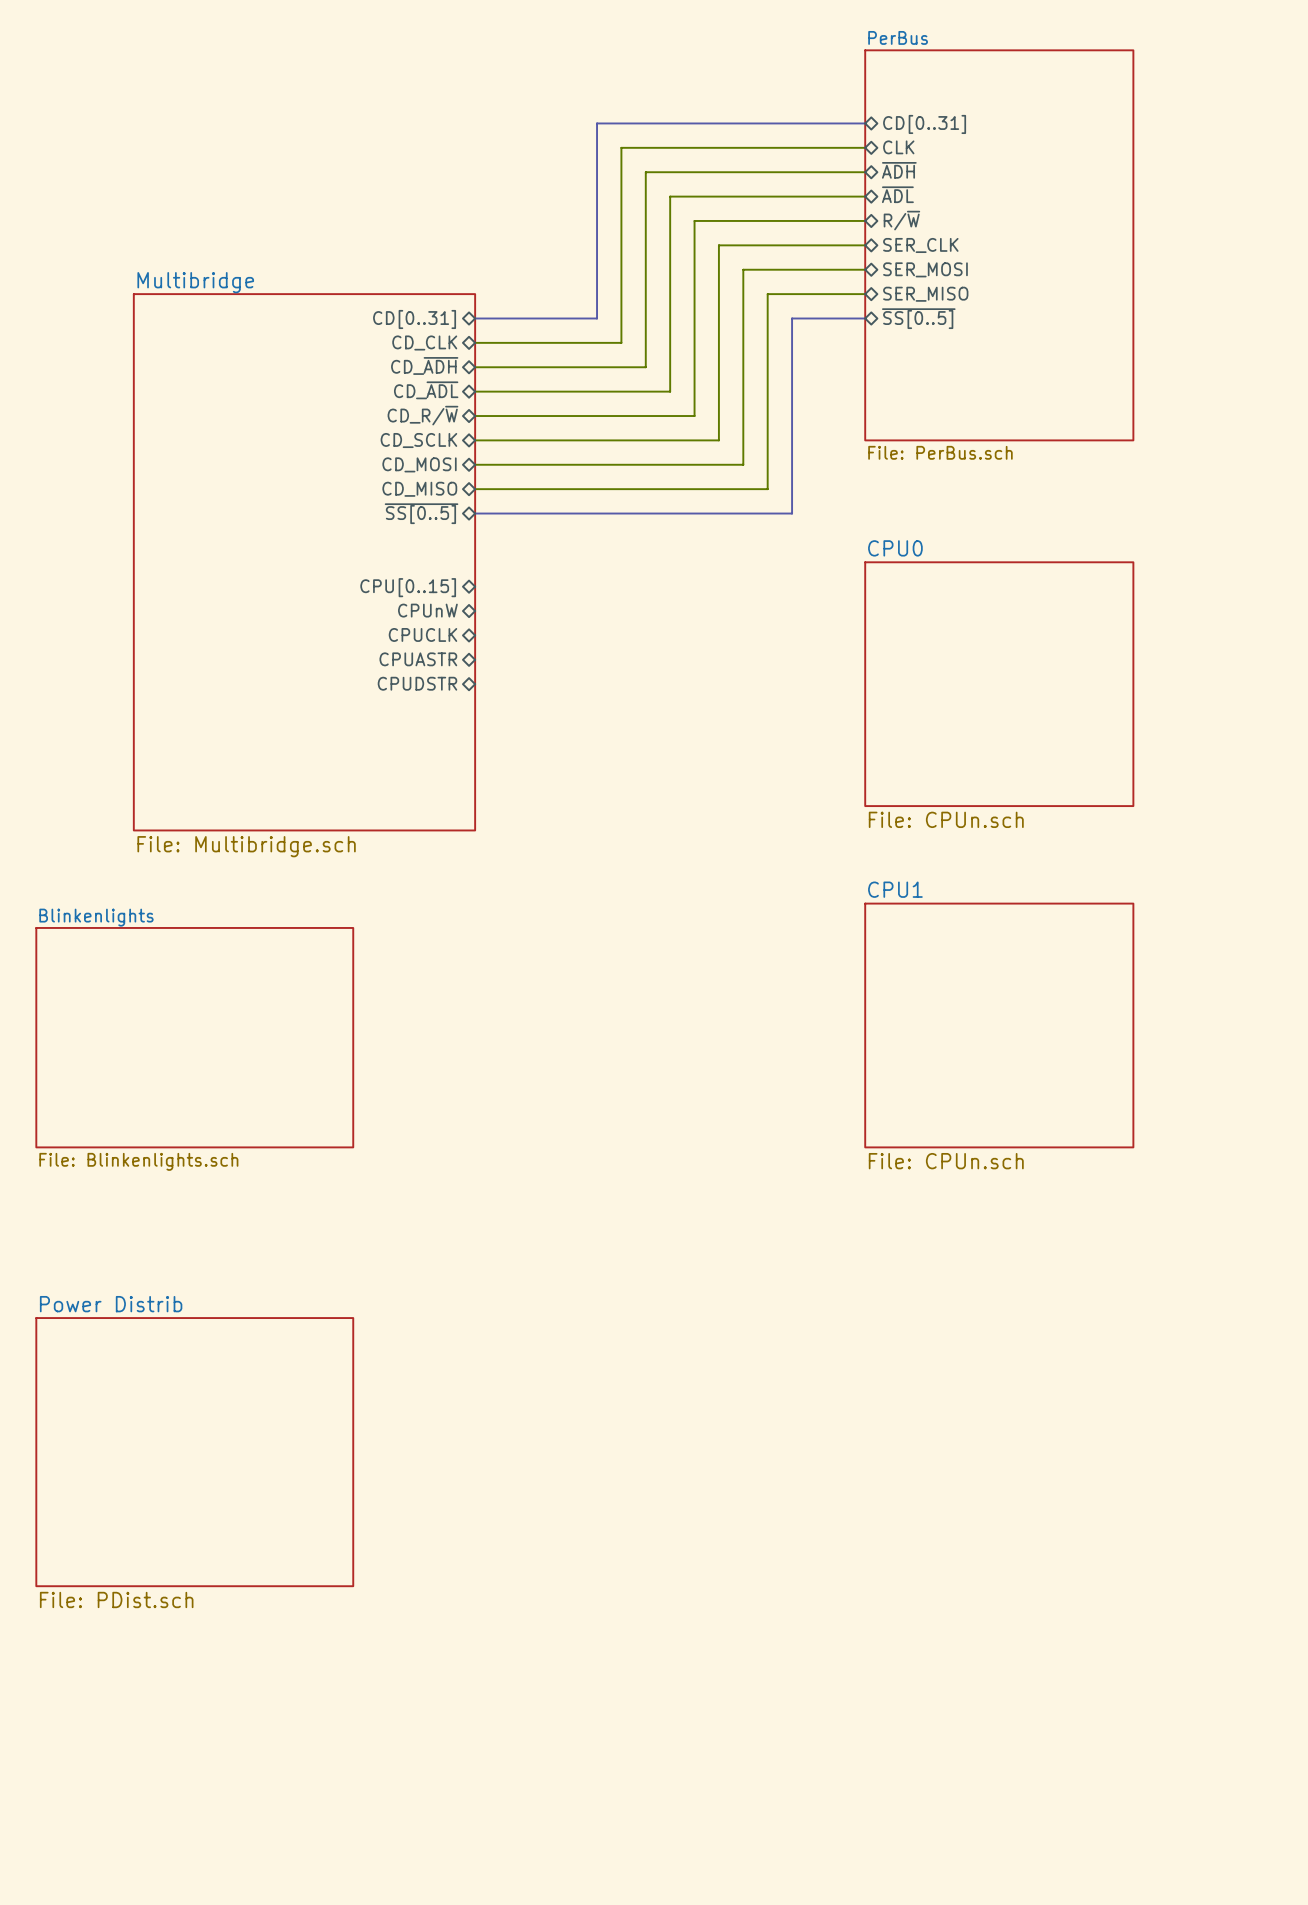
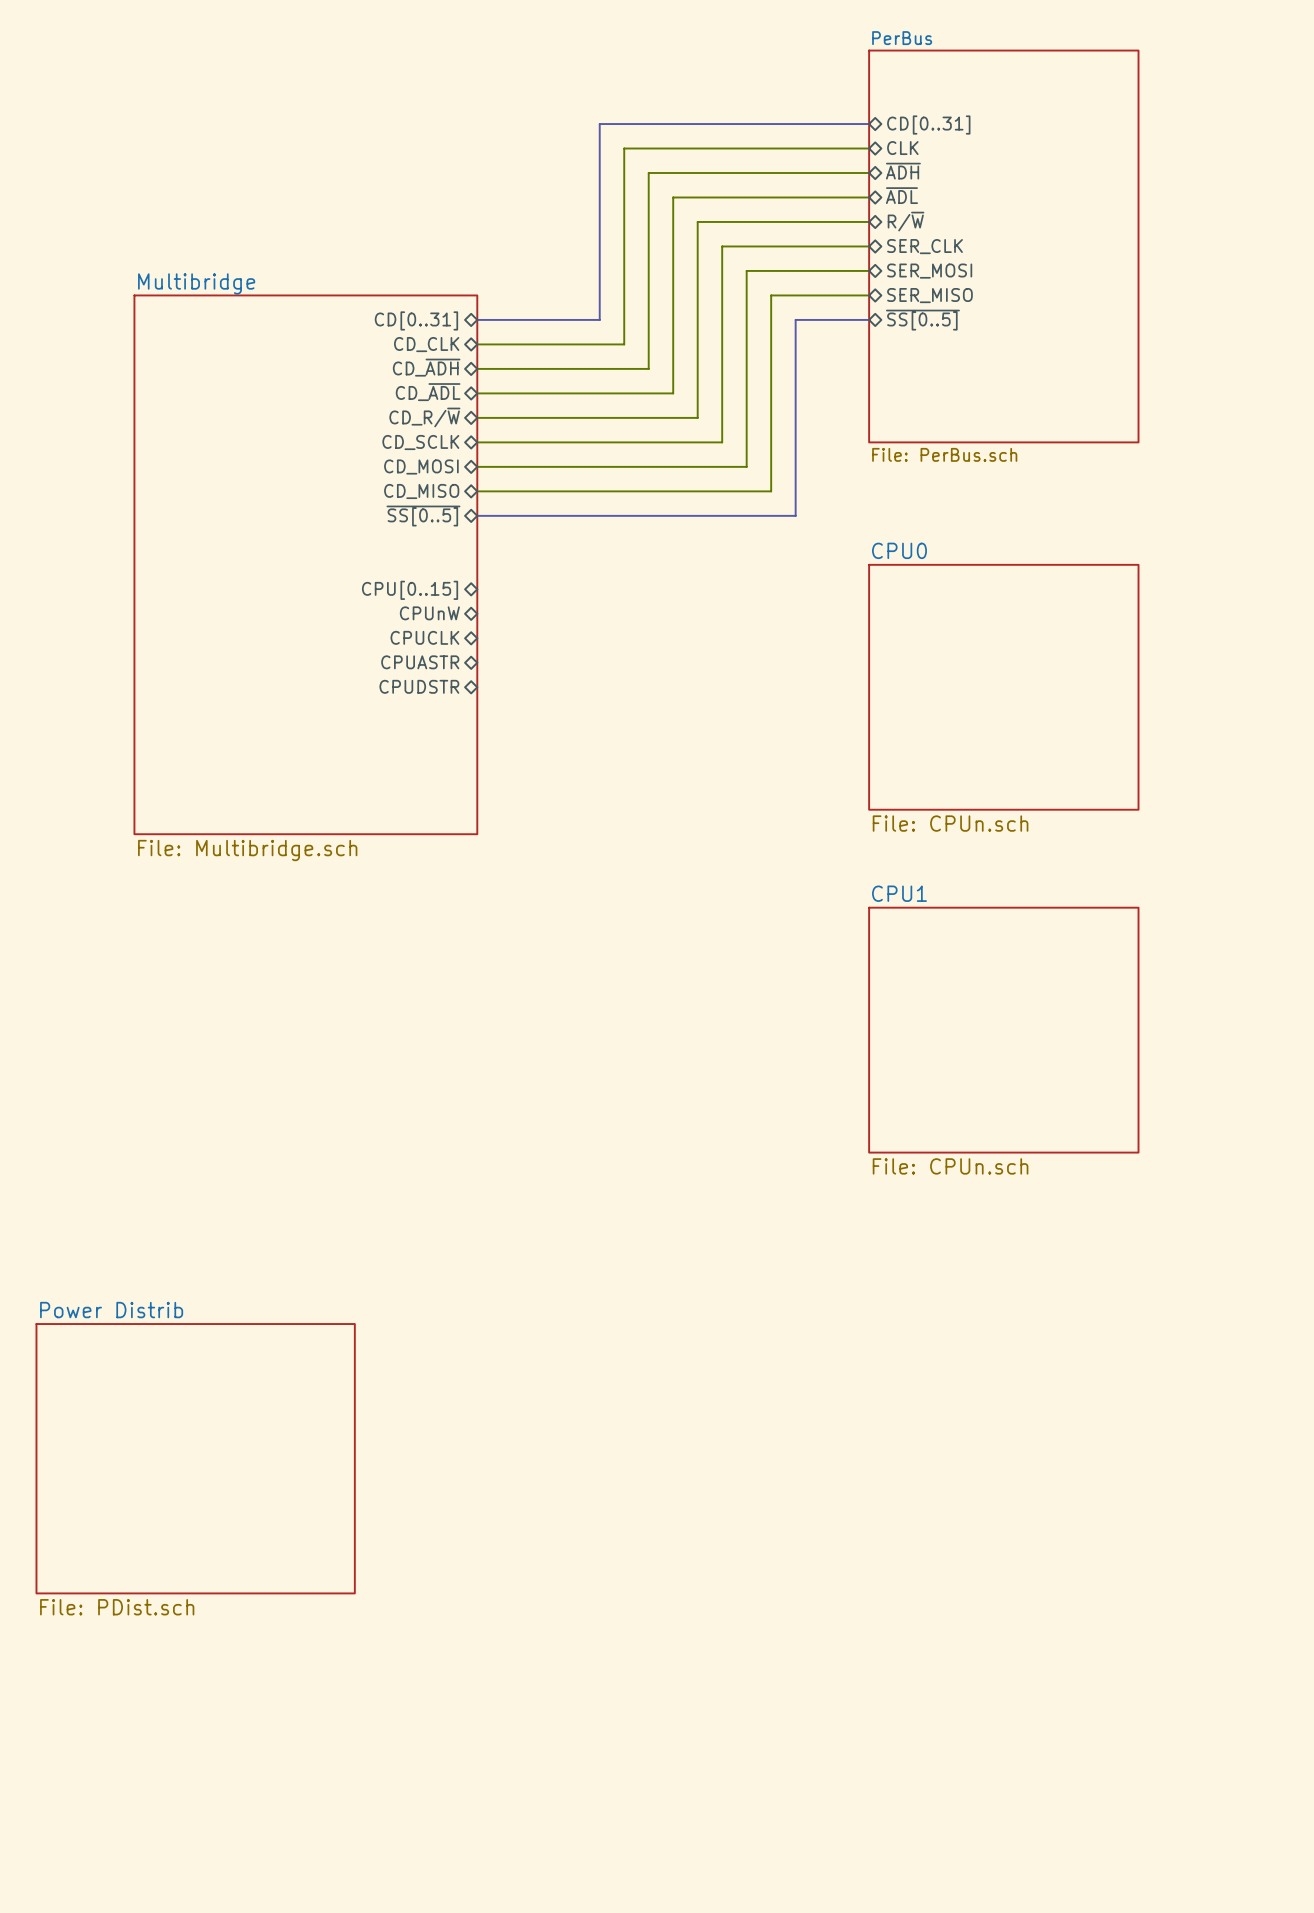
sheet Blinkenlights: File: Blinkenlights.sch (194, 1037) -> none

